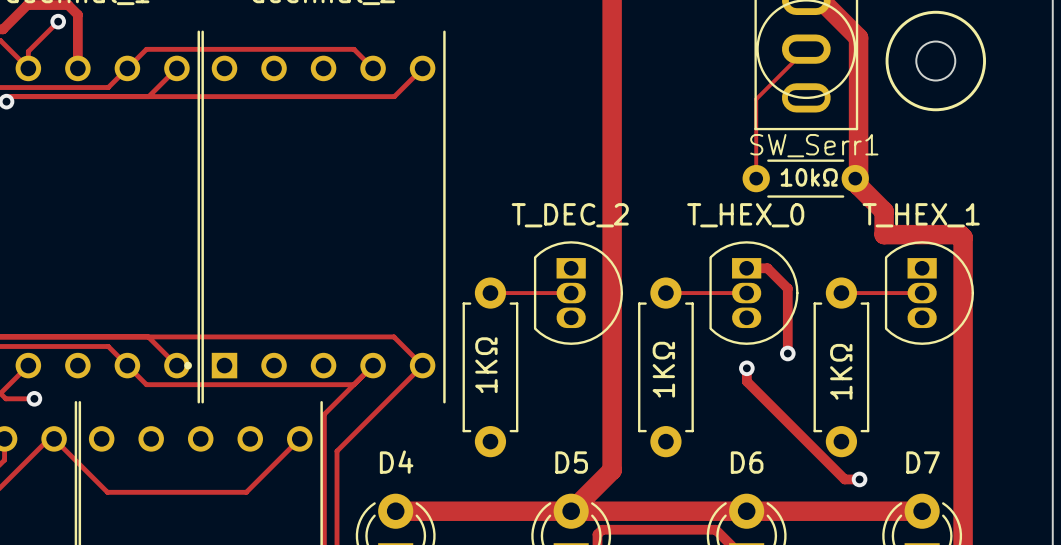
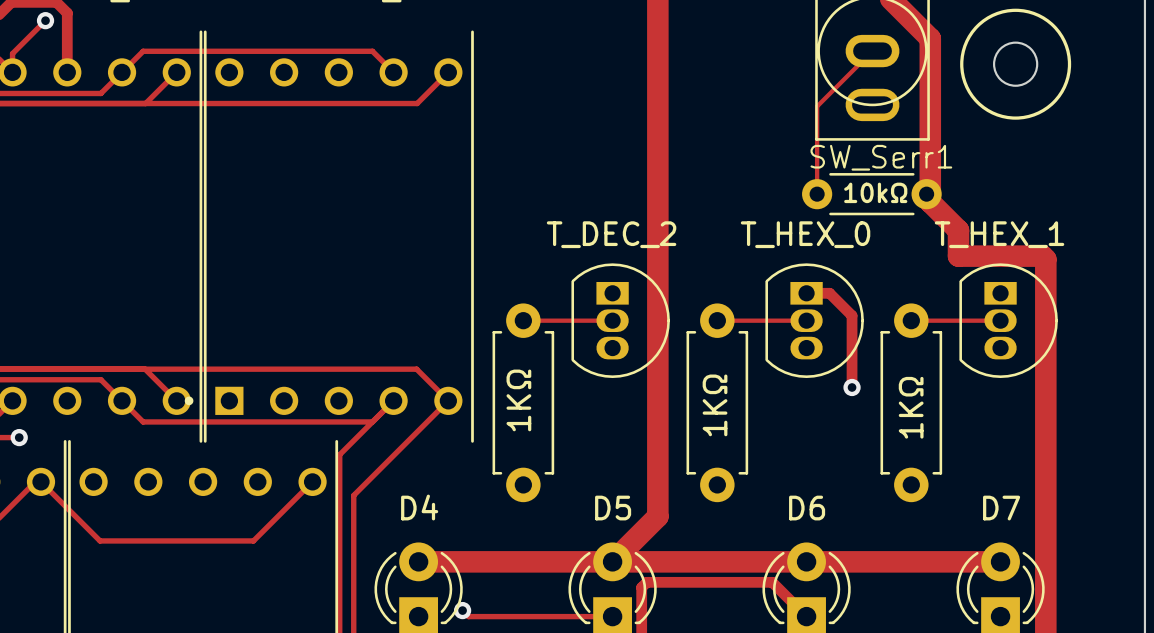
track: (746, 368) (746, 381) (844, 479) (859, 479) -> none
via: (746, 368) -> none
via: (859, 479) -> none

